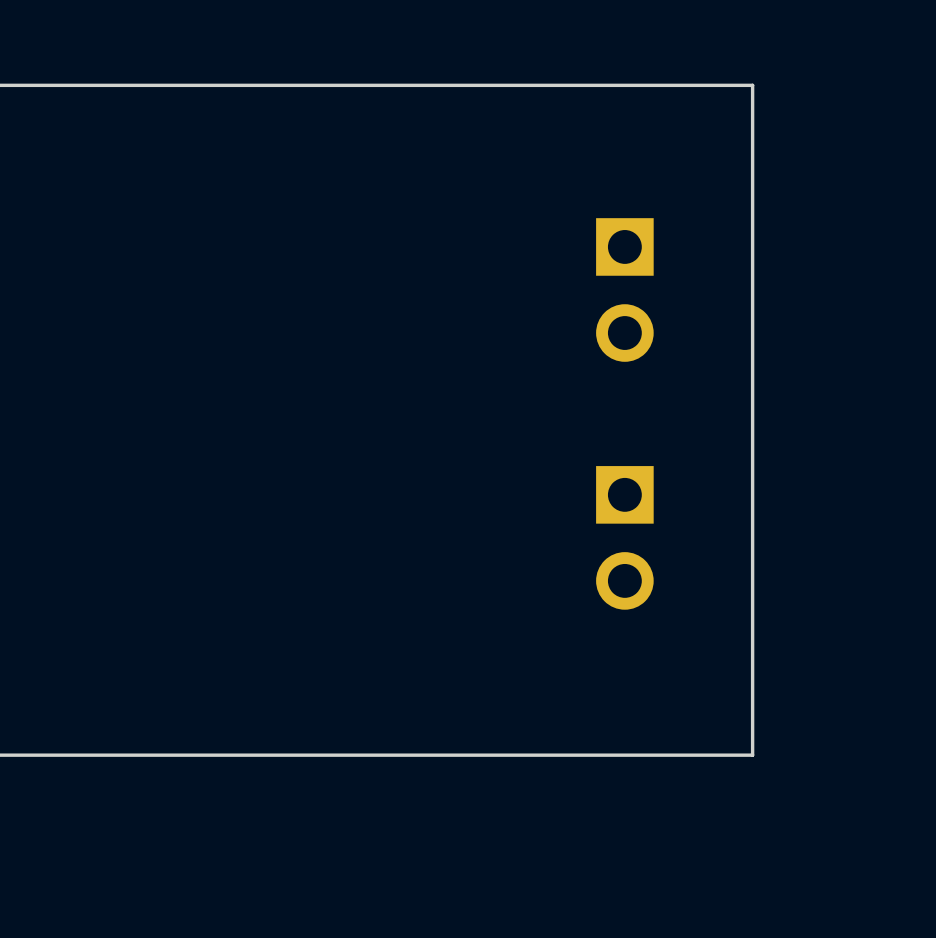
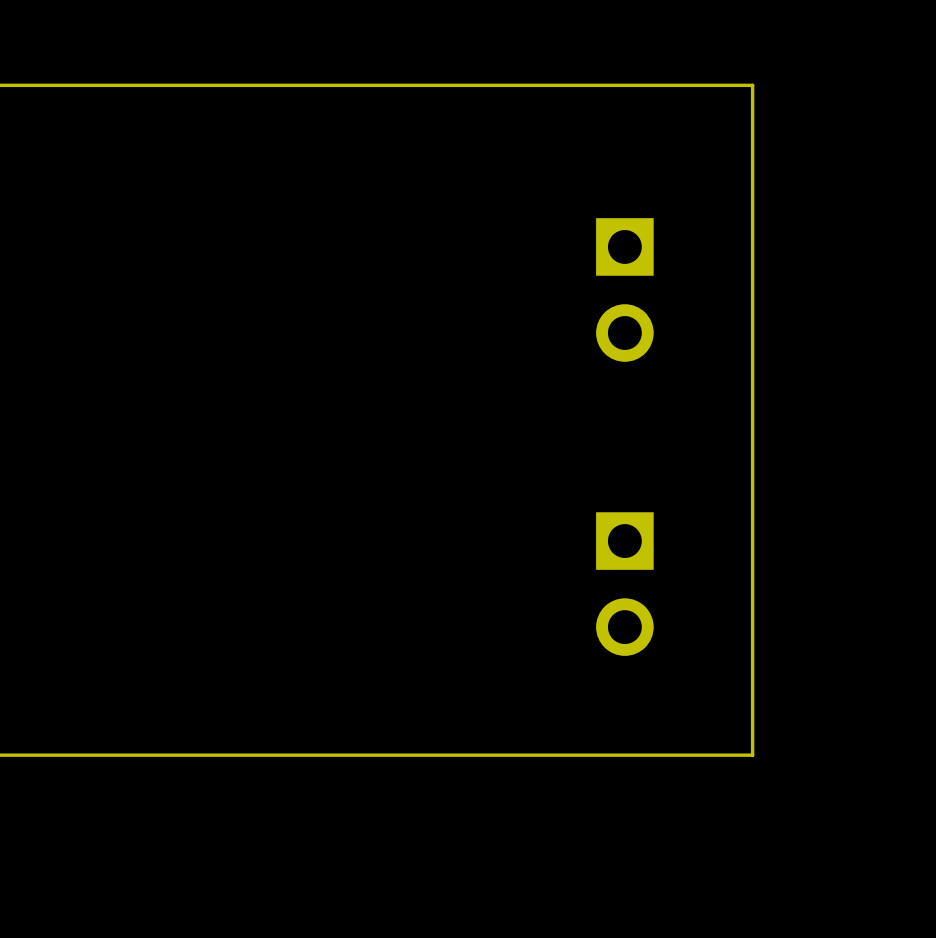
part position: (624, 537) -> (624, 584)

